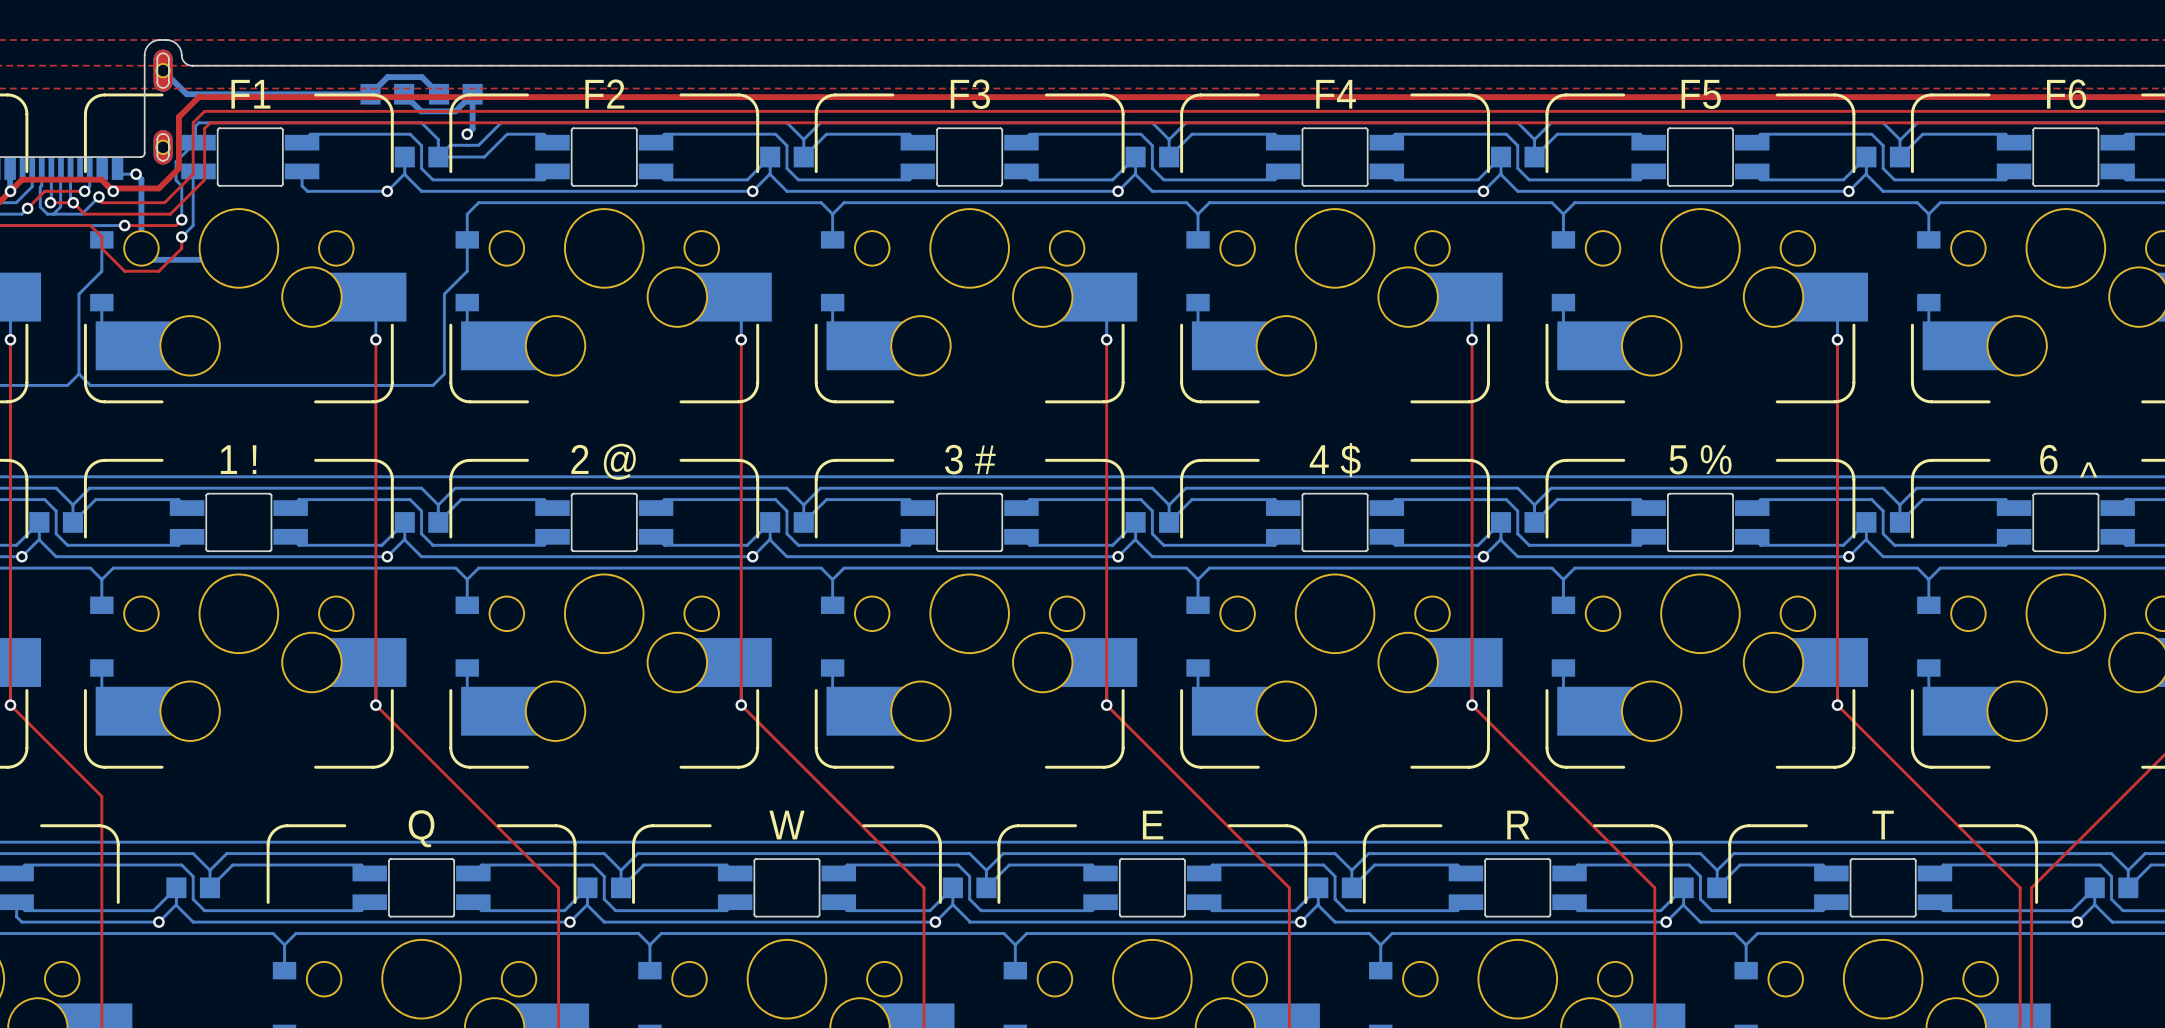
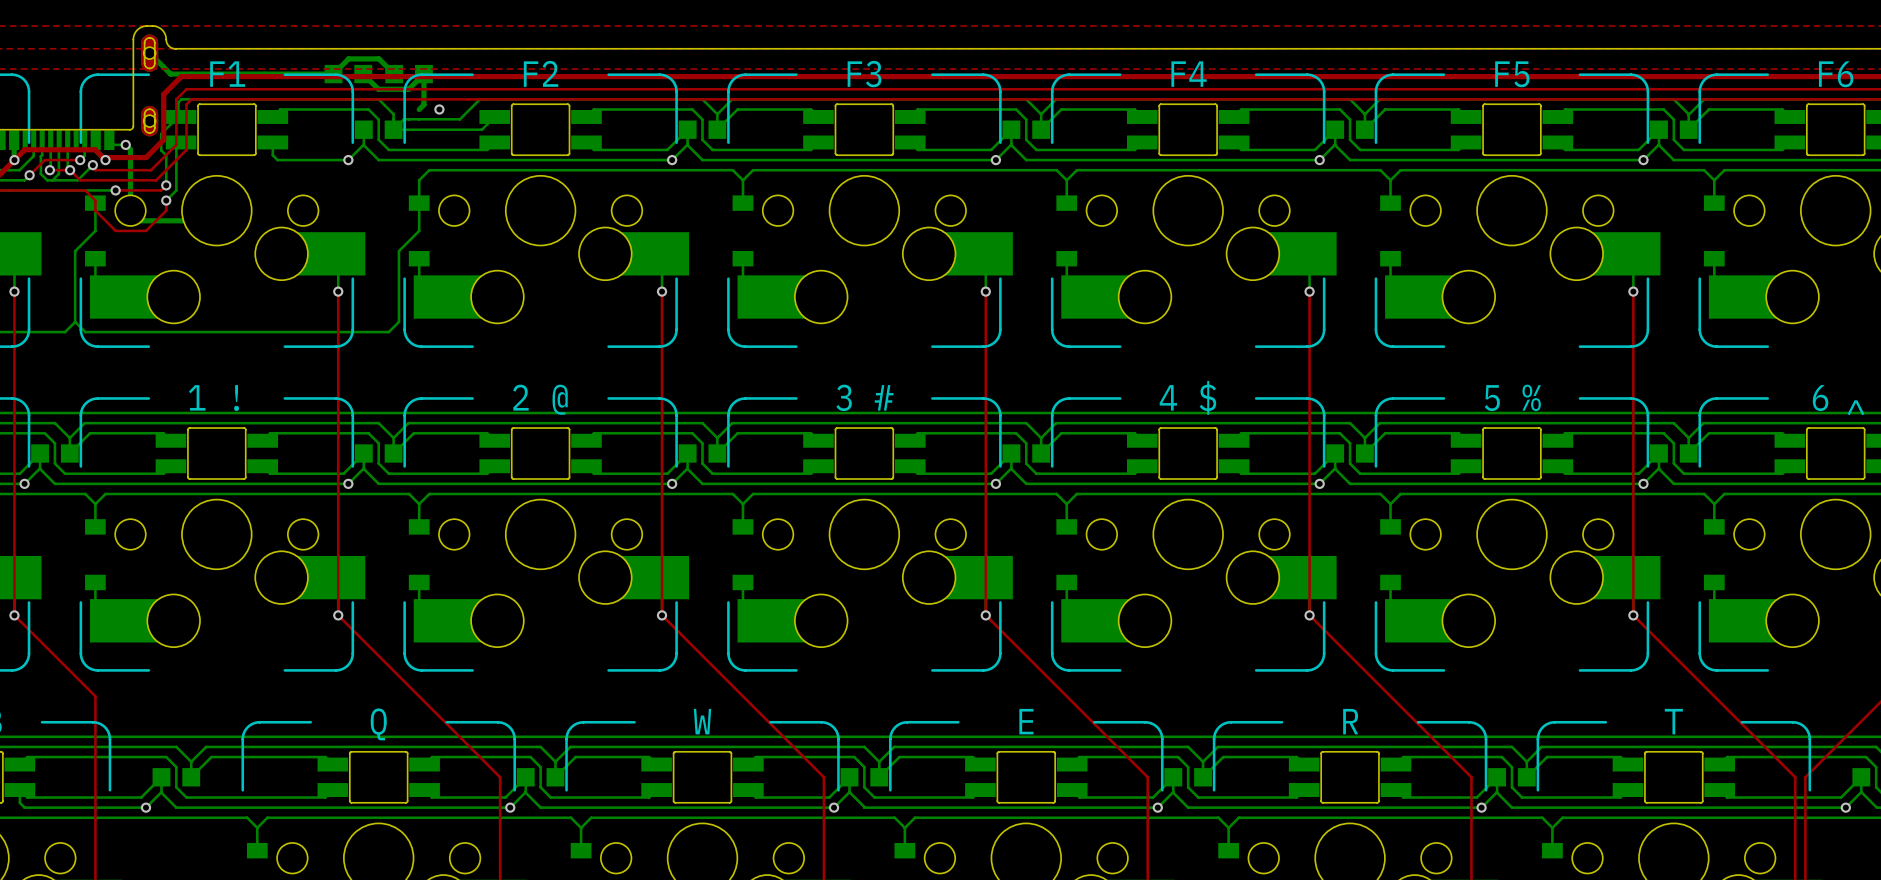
bottom track: (535, 122) (501, 122) (478, 145) -> (479, 99) (459, 119) (429, 119)
via position: (467, 134) -> (439, 109)
bottom track: (552, 142) (544, 134) (507, 134) (484, 157) -> (494, 116) (481, 129) (434, 129)

